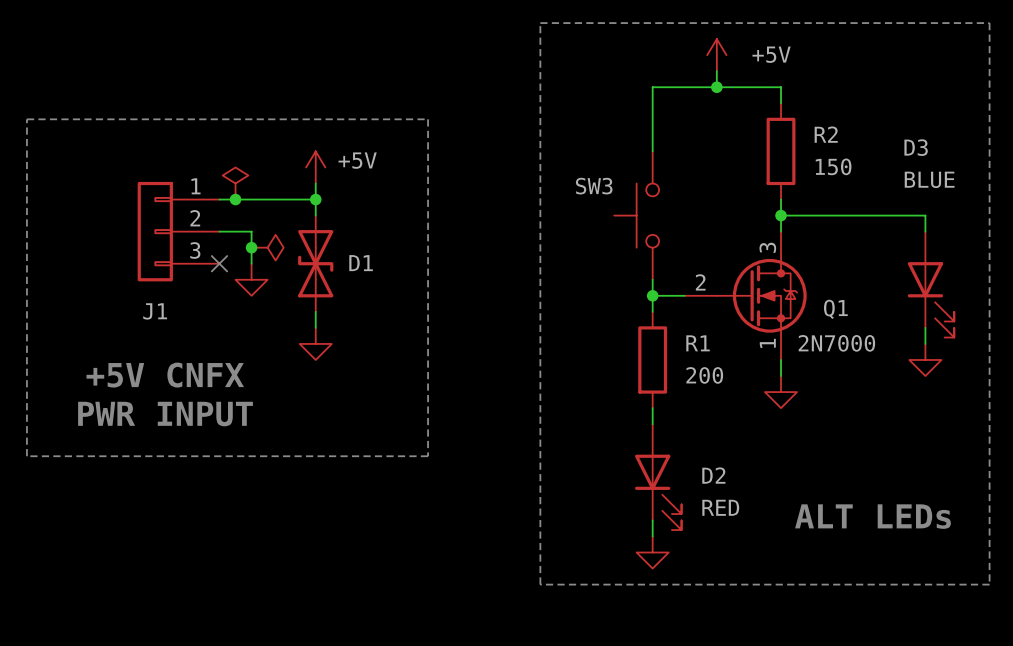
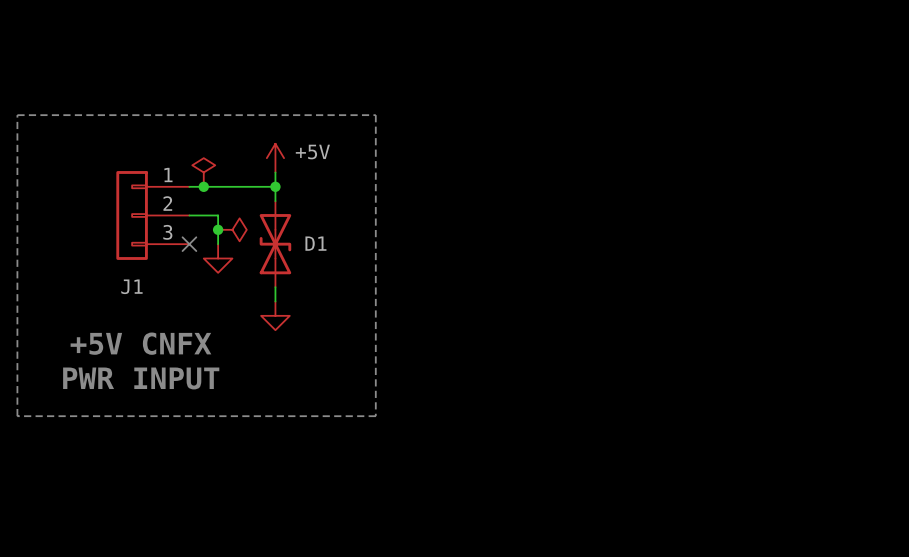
line: (540, 23) (989, 23) (989, 584) (540, 584) (540, 23) -> none
power symbol: +5V (716, 55) -> none
wire: (716, 71) (716, 87) -> none
junction: (716, 87) -> none
wire: (781, 103) (781, 87) (652, 87) (652, 151) -> none
R2: 150 (781, 151) -> none
wire: (781, 199) (781, 231) -> none
SW3: (636, 215) -> none
wire: (781, 215) (925, 215) (925, 231) -> none
junction: (781, 215) -> none
wire: (652, 279) (652, 311) -> none
D3: BLUE (931, 284) -> none
wire: (652, 295) (684, 295) -> none
junction: (652, 295) -> none
Q1: 2N7000 (745, 295) -> none
wire: (925, 327) (925, 343) -> none
R1: 200 (652, 359) -> none
wire: (781, 359) (781, 376) -> none
power symbol: (925, 359) -> none
power symbol: (781, 392) -> none
wire: (652, 408) (652, 424) -> none
D2: RED (658, 477) -> none
text: ALT LEDs (873, 516) -> none
wire: (652, 520) (652, 536) -> none
power symbol: (652, 552) -> none

